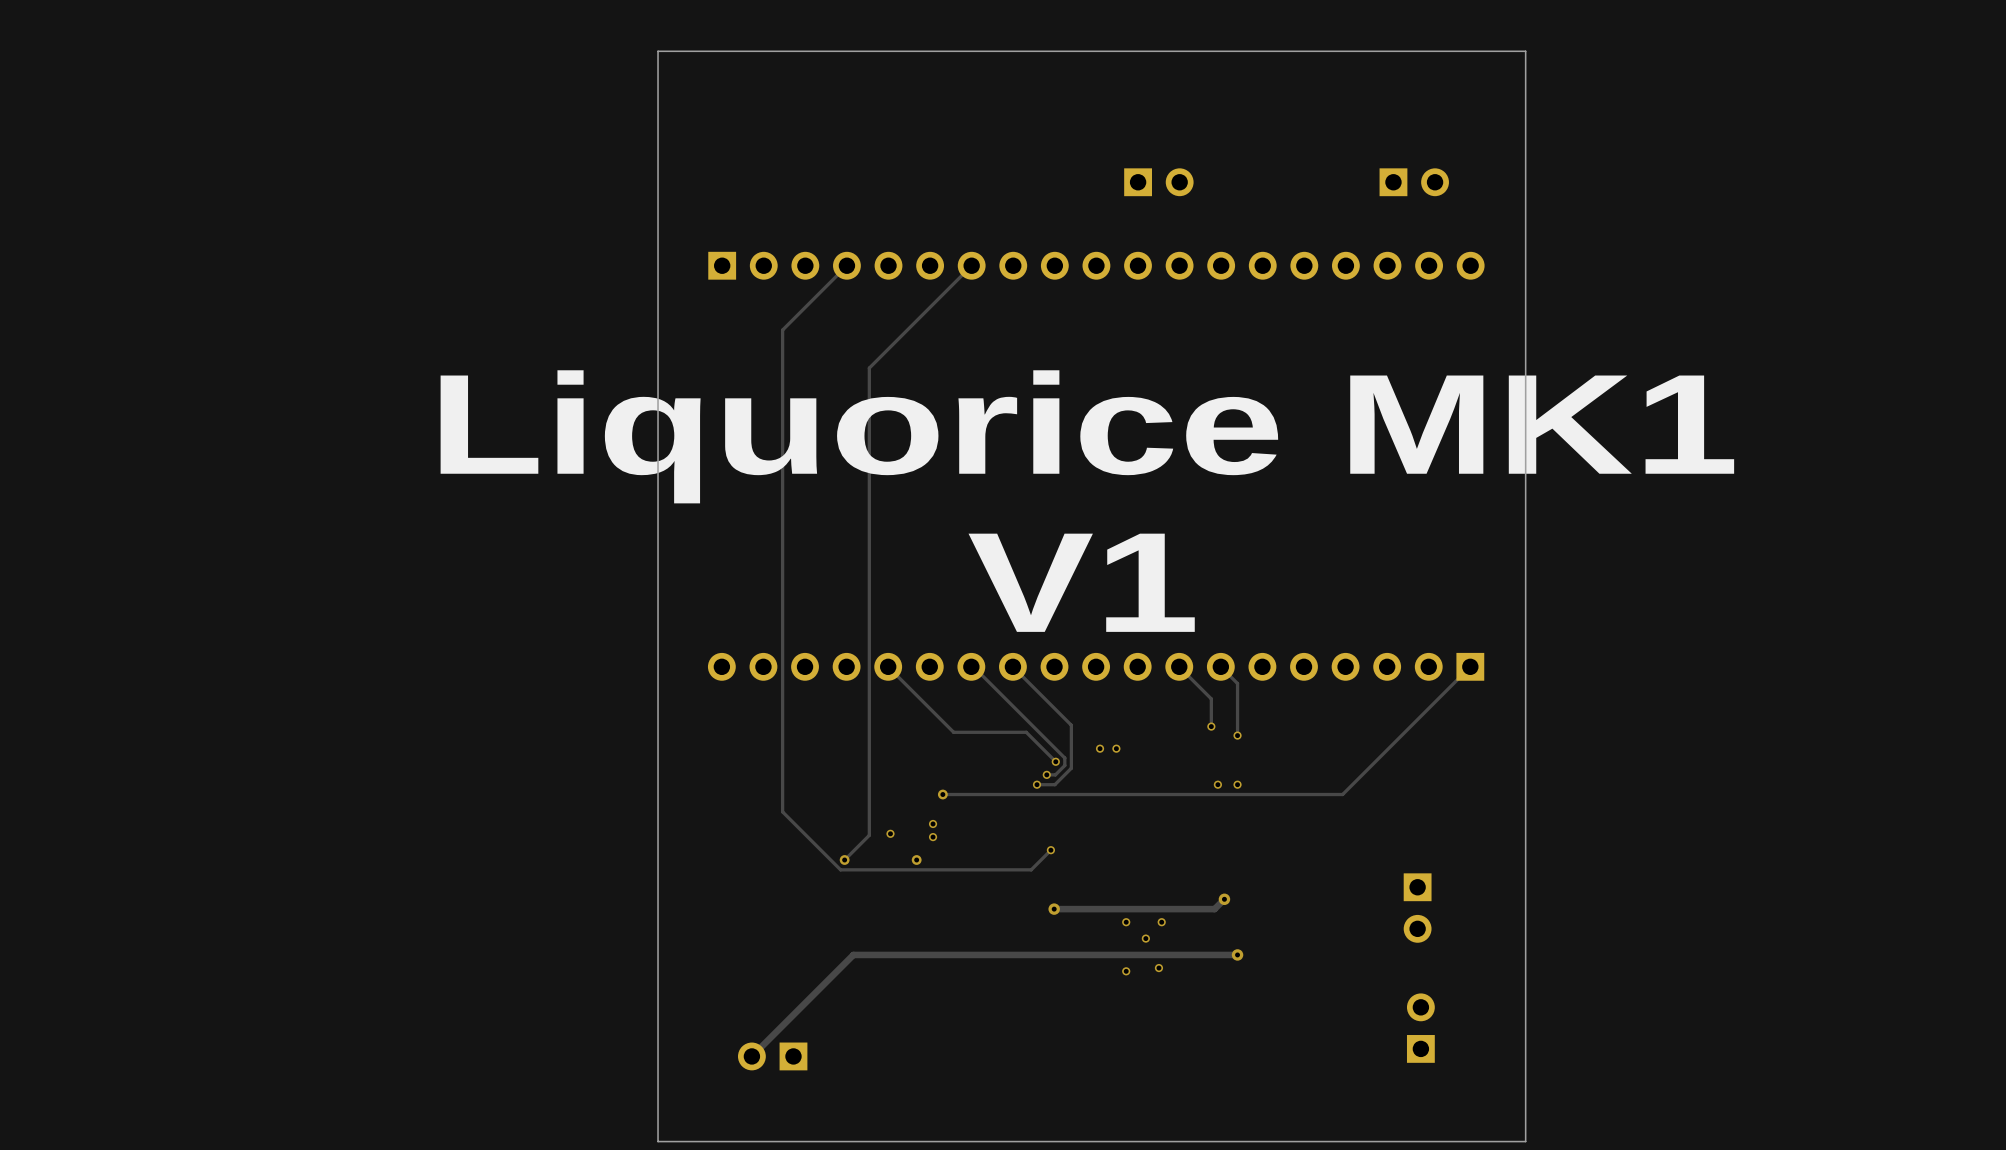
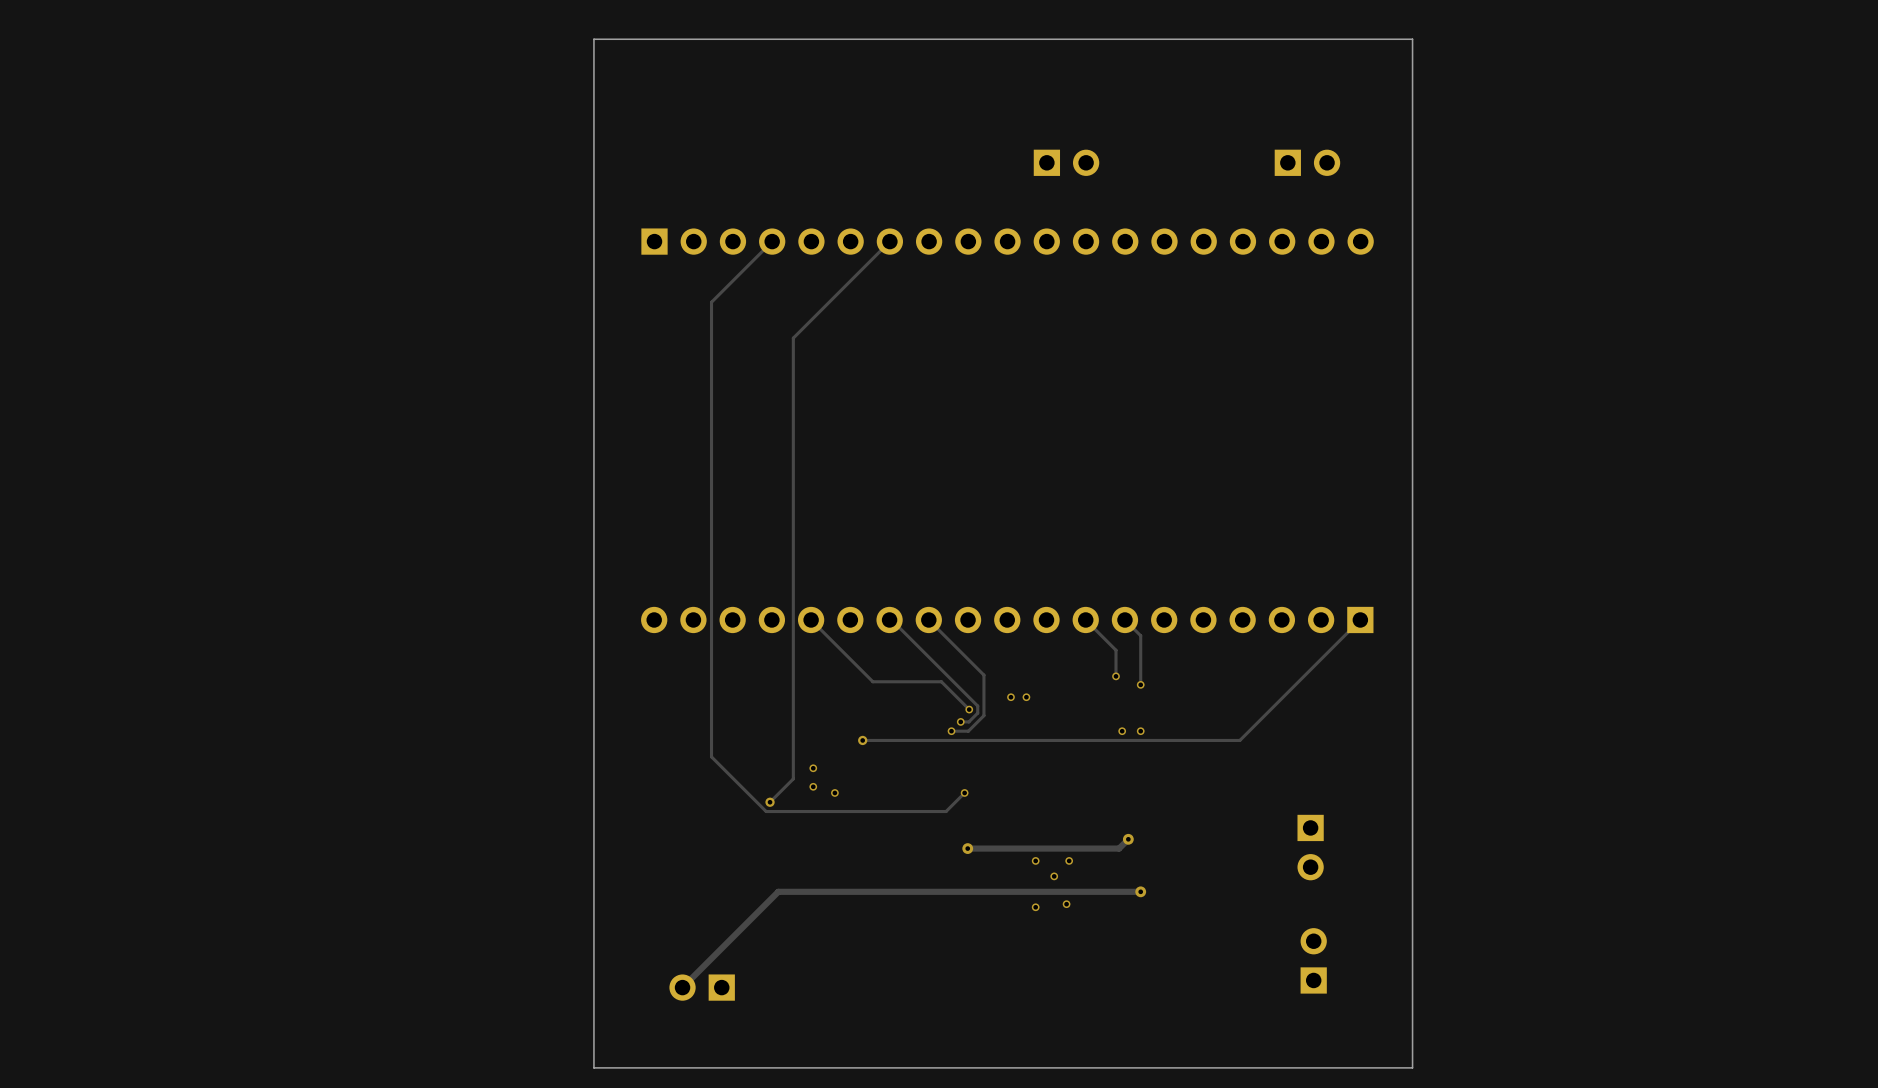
text: Liquorice MK1 (1087, 436) -> none
text: V1 (1081, 582) -> none
via: none -> (813, 768)
via: (933, 823) -> none
via: (890, 833) -> none
via: (933, 837) -> none
via: none -> (813, 786)
via: none -> (834, 792)
via: (916, 860) -> none

